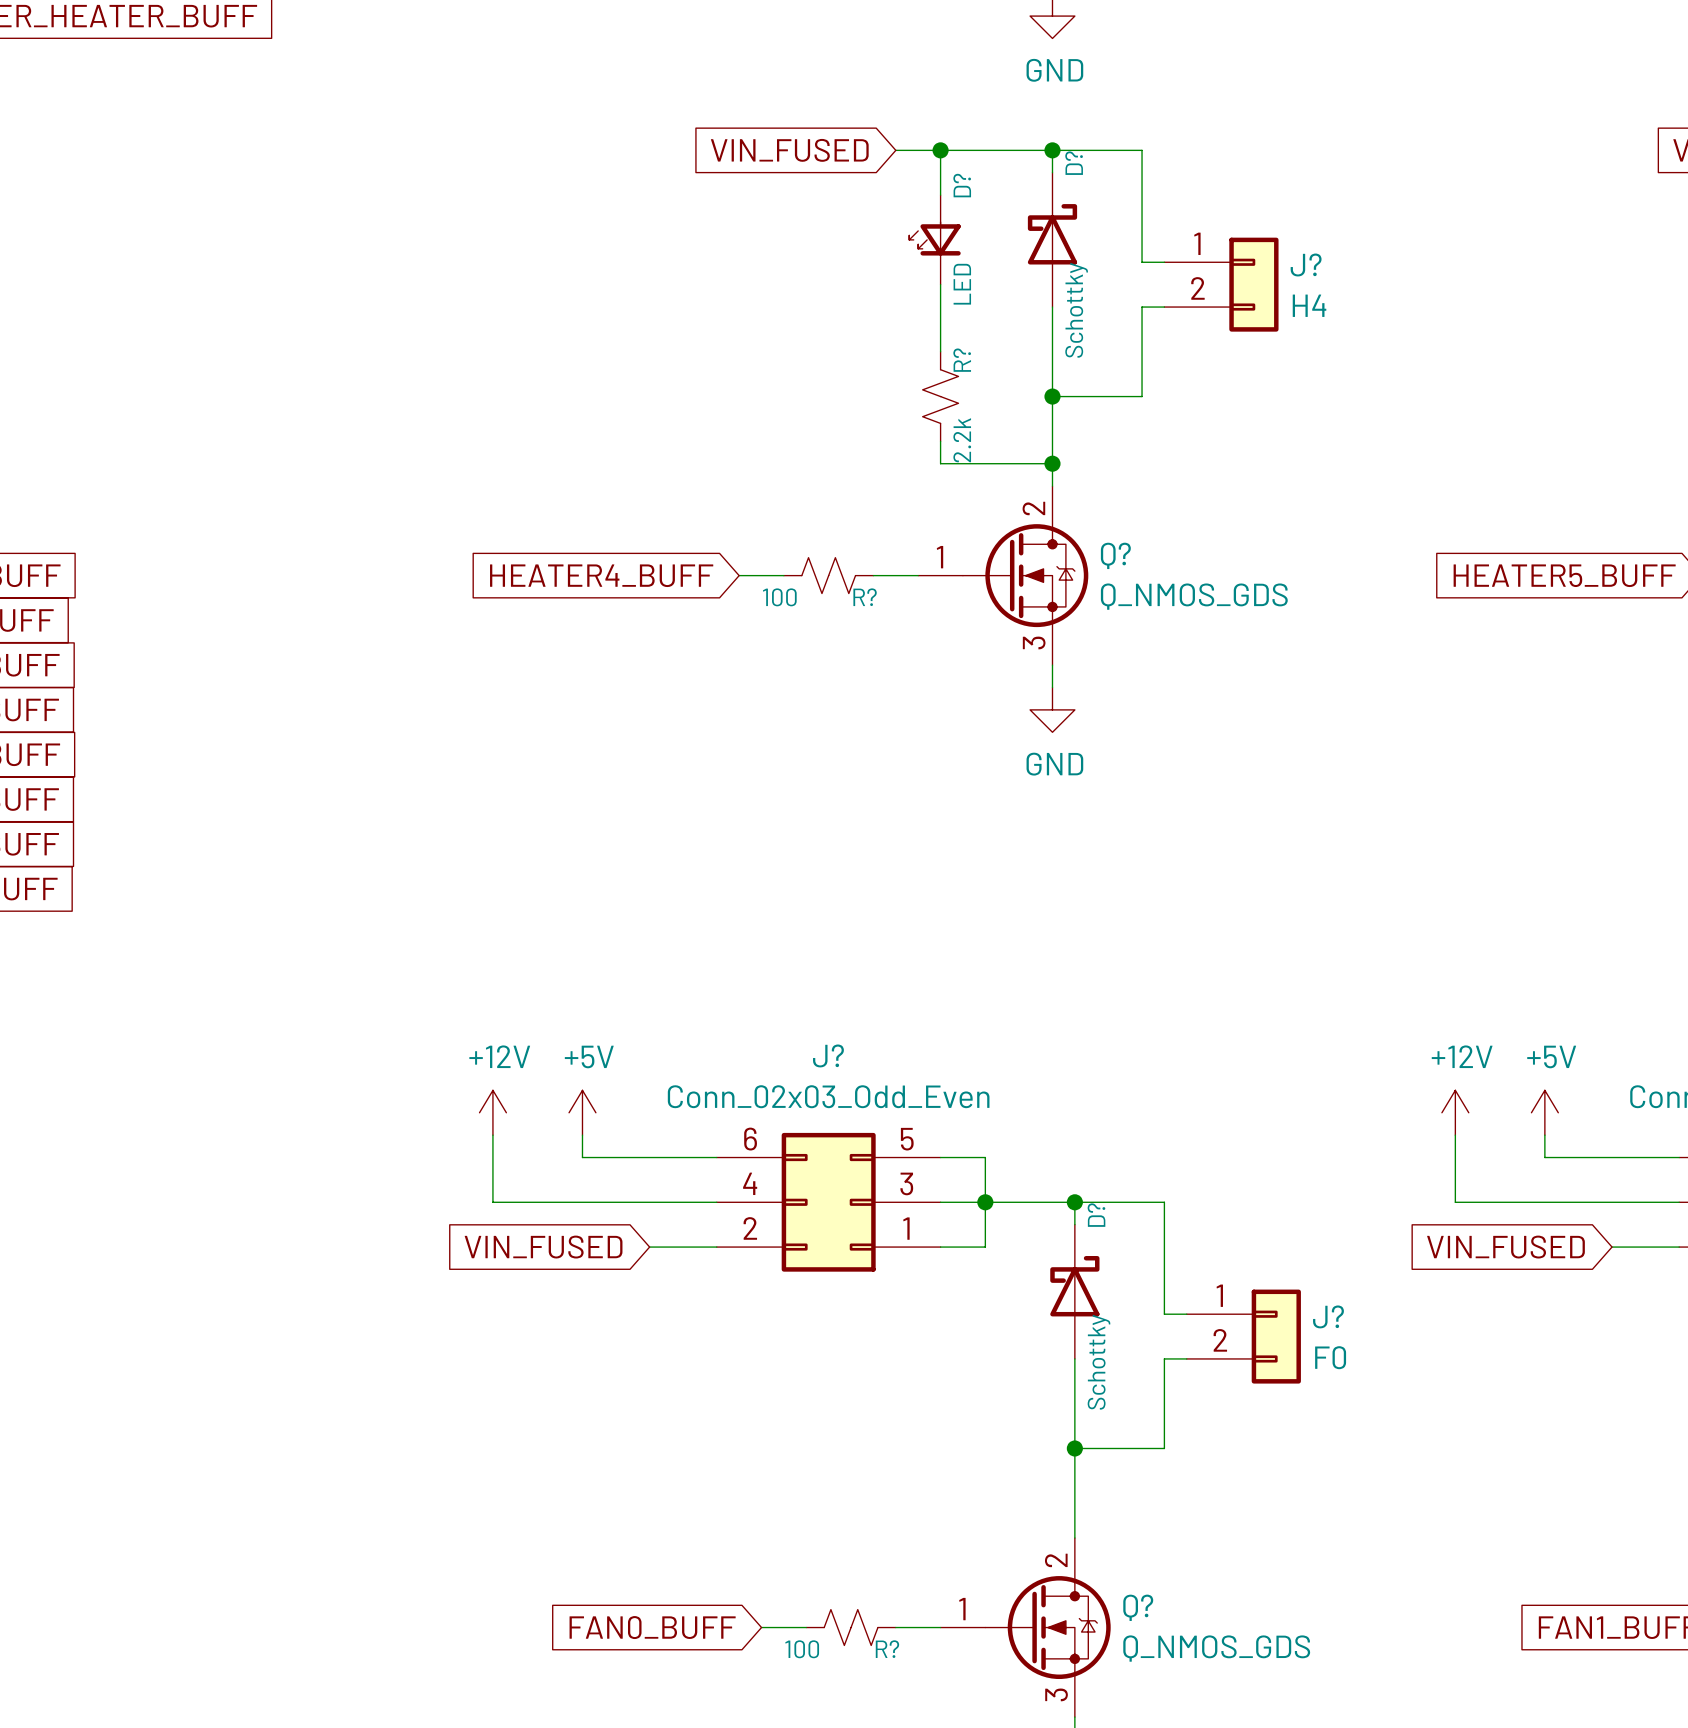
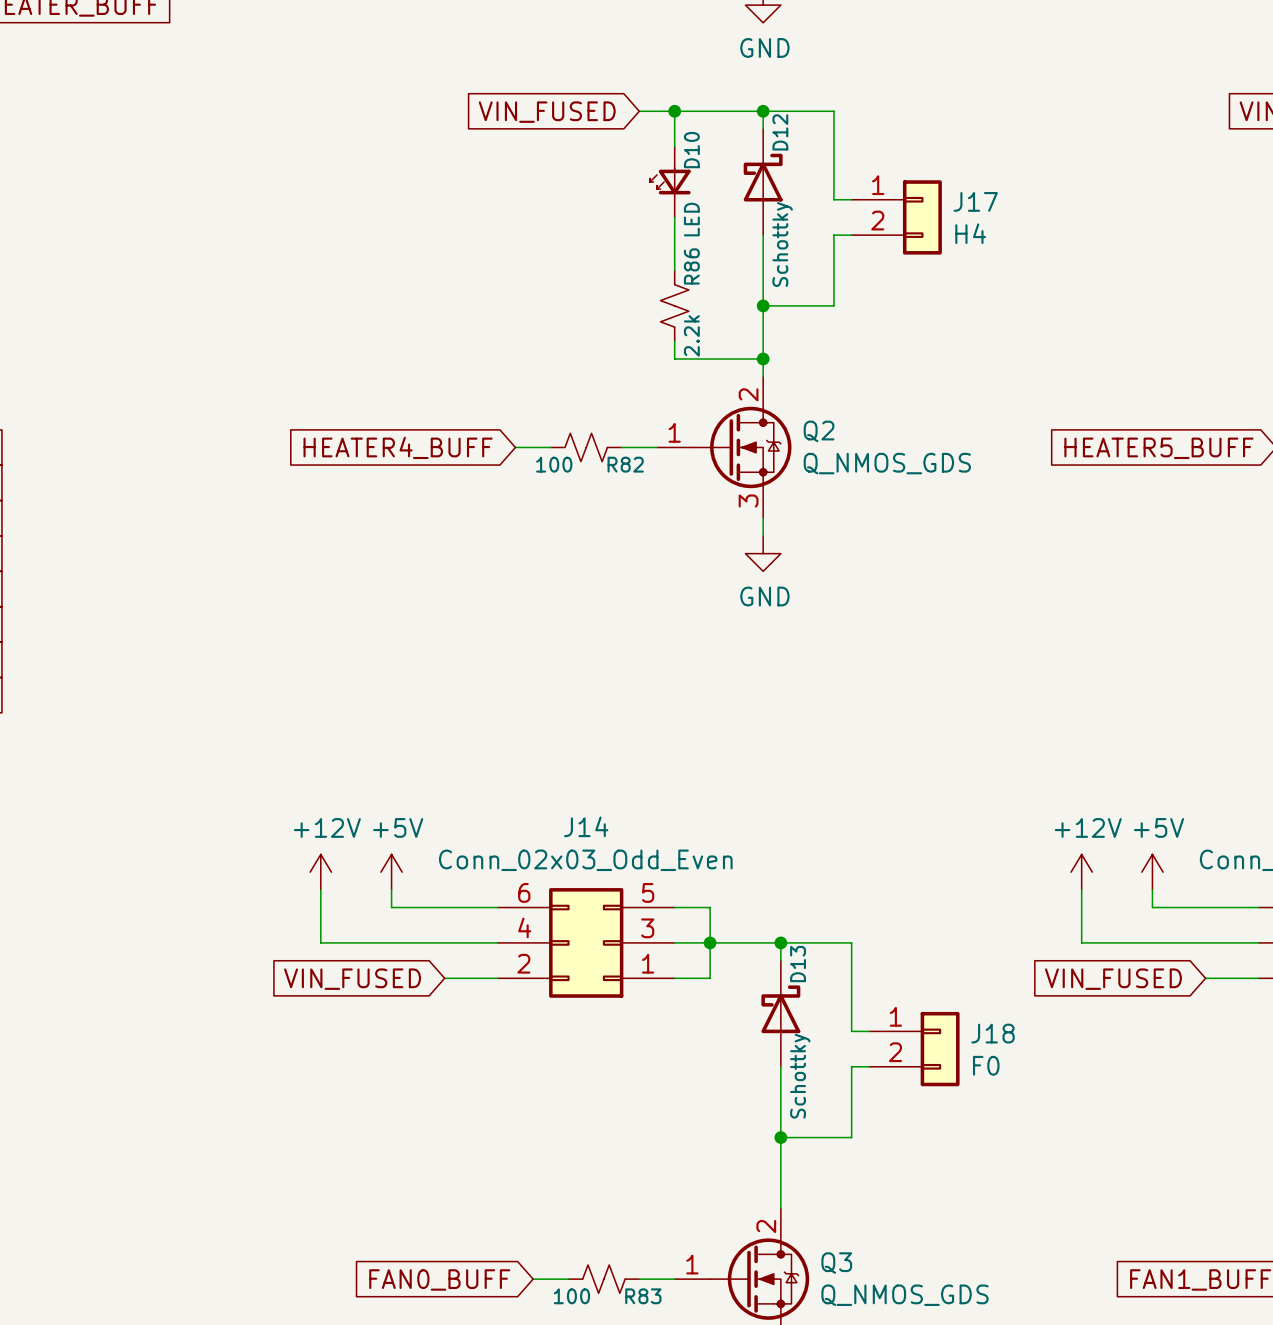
D? name: D? (1074, 163) -> D12 (780, 132)
D? name: D? (962, 185) -> D10 (691, 150)
J? name: J? (1306, 265) -> J17 (975, 201)
R? name: R? (962, 360) -> R86 (691, 266)
Q? name: Q? (1115, 555) -> Q2 (819, 431)
R? name: R? (865, 597) -> R82 (625, 464)
J? name: J? (828, 1055) -> J14 (586, 826)
D? name: D? (1096, 1215) -> D13 (798, 964)
J? name: J? (1328, 1316) -> J18 (992, 1033)
Q? name: Q? (1138, 1607) -> Q3 (836, 1263)
R? name: R? (887, 1649) -> R83 (643, 1296)

